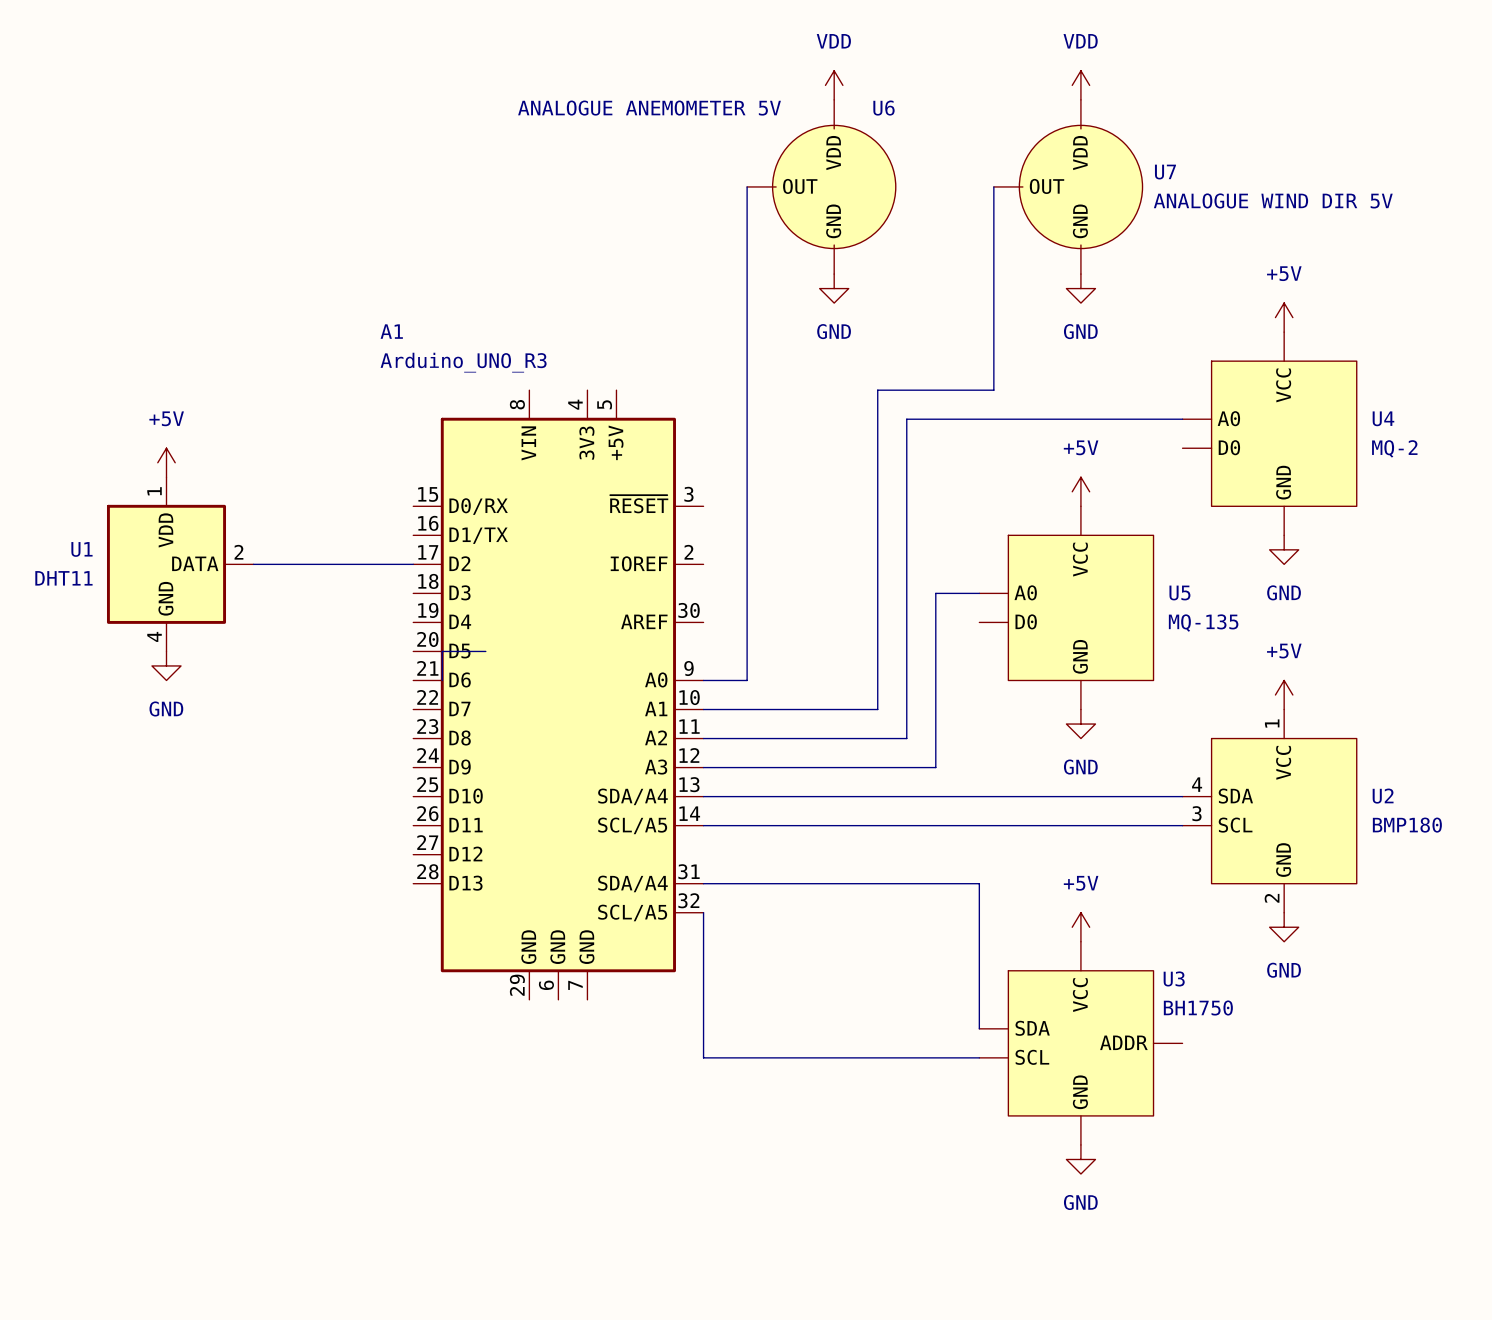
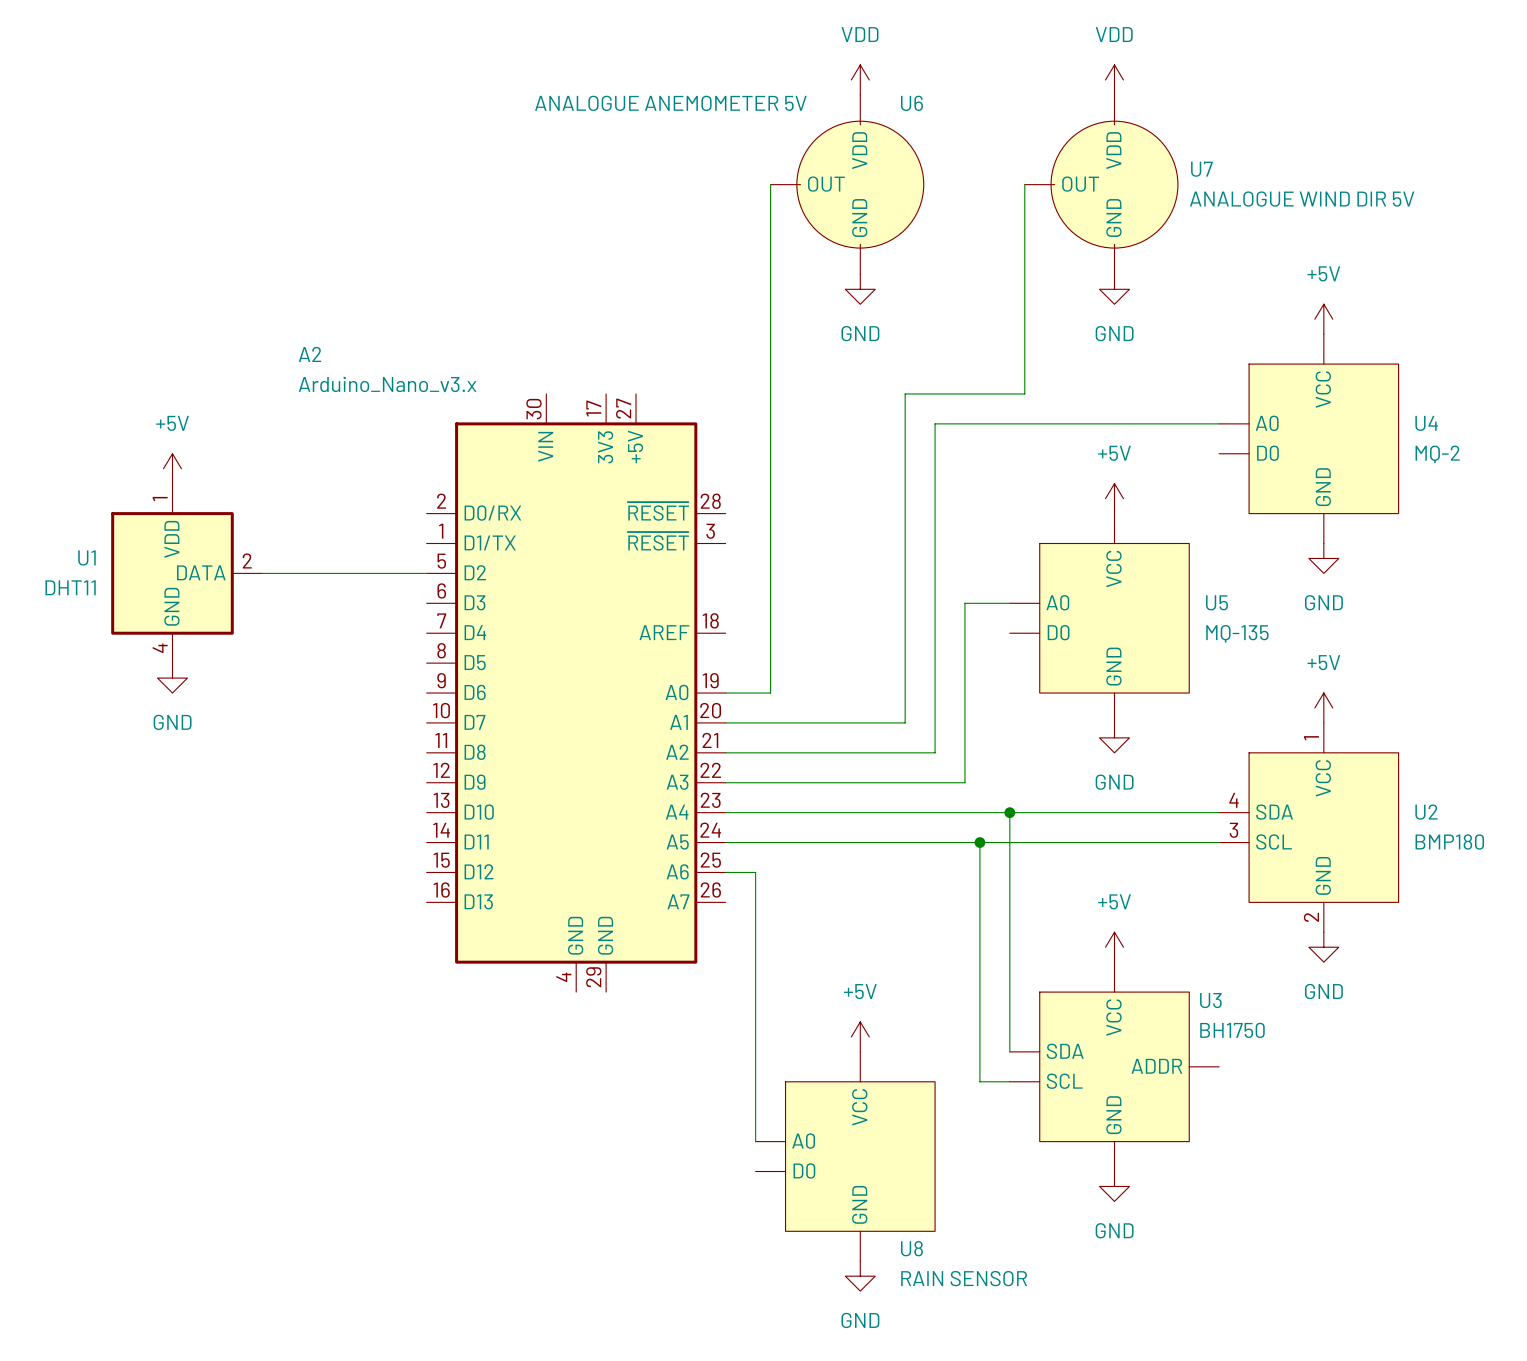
A2: none -> Arduino_Nano_v3.x (576, 693)
A1: Arduino_UNO_R3 (558, 695) -> none
junction: none -> (1009, 812)
junction: none -> (979, 842)
wire: none -> (725, 872) (755, 872) (755, 1141)
wire: (703, 883) (979, 883) -> (1009, 812) (1009, 902)
wire: (703, 912) (703, 1057) (950, 1057) -> (979, 842) (979, 1081)
power symbol: none -> +5V (860, 1036)
U8: none -> RAIN SENSOR (845, 1156)
power symbol: none -> GND (860, 1276)

